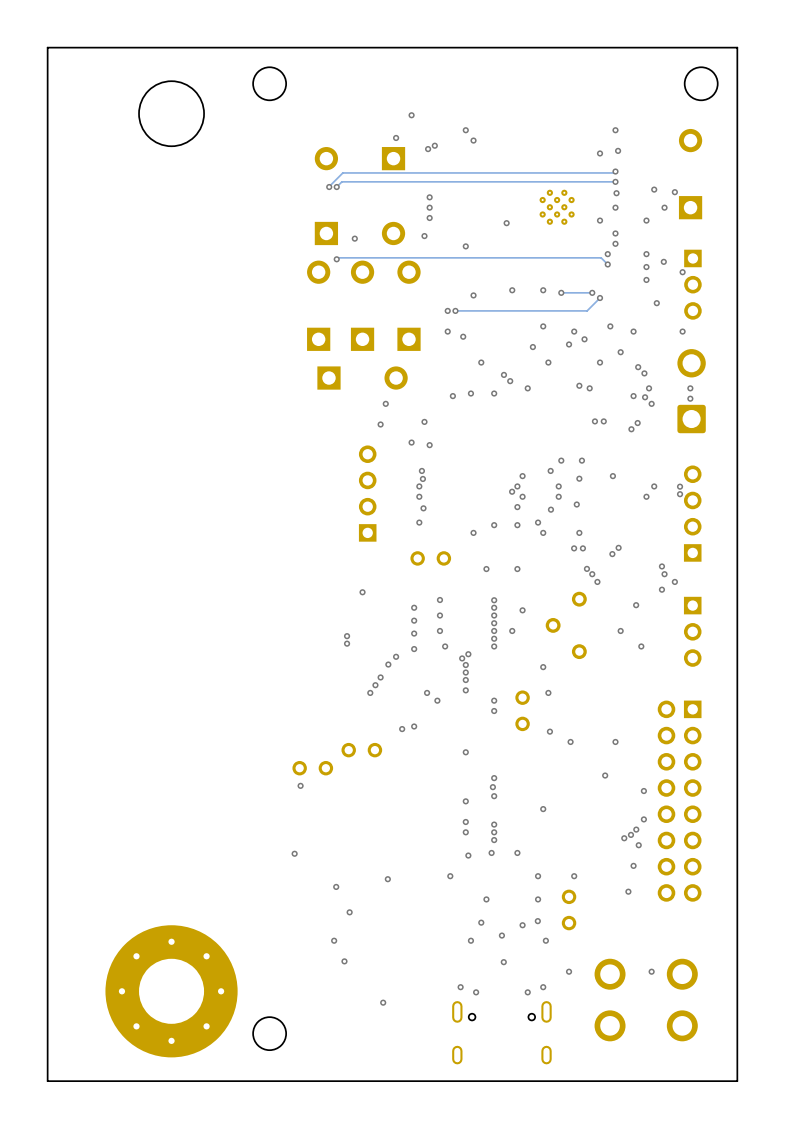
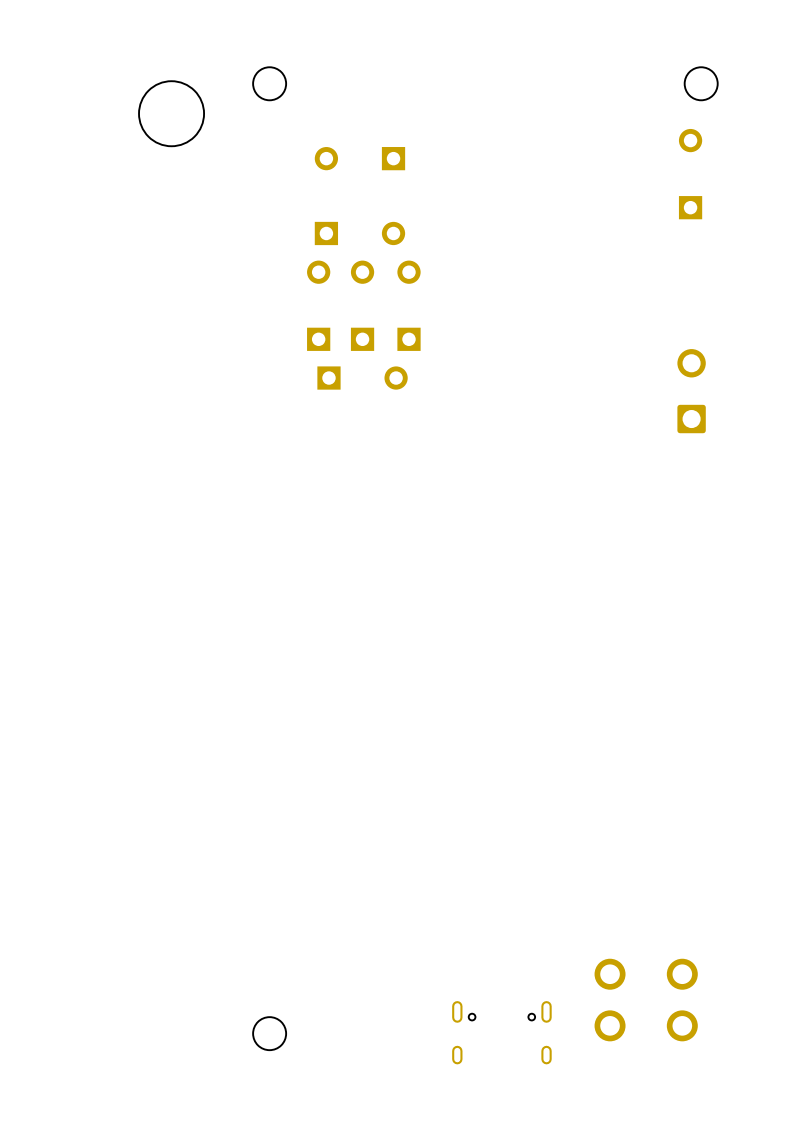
board edge: (737, 47) (47, 47) (47, 1081) (737, 1081) (737, 47) -> none
via: (411, 115) -> none
via: (465, 130) -> none
via: (615, 130) -> none
via: (396, 137) -> none
via: (473, 140) -> none
via: (434, 145) -> none
via: (428, 149) -> none
via: (618, 150) -> none
via: (600, 153) -> none
track: (615, 171) (342, 172) (329, 187) -> none
via: (615, 171) -> none
track: (615, 181) (341, 181) (336, 187) -> none
via: (615, 181) -> none
via: (329, 187) -> none
via: (336, 187) -> none
via: (654, 189) -> none
via: (674, 192) -> none
via: (616, 193) -> none
via: (429, 197) -> none
via: (429, 207) -> none
part: (557, 207) -> none
via: (615, 207) -> none
via: (664, 207) -> none
via: (429, 217) -> none
via: (600, 220) -> none
via: (646, 220) -> none
via: (506, 223) -> none
via: (615, 233) -> none
via: (424, 236) -> none
via: (354, 238) -> none
via: (615, 243) -> none
via: (465, 246) -> none
via: (607, 254) -> none
via: (646, 254) -> none
track: (336, 259) (601, 257) (607, 264) -> none
via: (336, 259) -> none
via: (663, 261) -> none
via: (607, 264) -> none
via: (646, 267) -> none
via: (682, 272) -> none
via: (646, 279) -> none
part: (692, 284) -> none
via: (512, 290) -> none
via: (543, 290) -> none
via: (561, 292) -> none
track: (592, 292) (561, 292) -> none
via: (592, 292) -> none
via: (473, 295) -> none
track: (600, 298) (587, 310) (455, 310) -> none
via: (600, 298) -> none
via: (656, 303) -> none
via: (447, 310) -> none
via: (455, 310) -> none
via: (543, 326) -> none
via: (610, 326) -> none
via: (447, 331) -> none
via: (574, 331) -> none
via: (633, 331) -> none
via: (682, 331) -> none
via: (463, 336) -> none
via: (584, 339) -> none
via: (569, 344) -> none
via: (532, 347) -> none
via: (620, 352) -> none
via: (481, 362) -> none
via: (548, 362) -> none
via: (600, 362) -> none
via: (638, 367) -> none
via: (644, 373) -> none
via: (503, 374) -> none
via: (510, 381) -> none
via: (579, 385) -> none
via: (527, 388) -> none
via: (589, 388) -> none
via: (649, 388) -> none
via: (690, 388) -> none
via: (470, 393) -> none
via: (494, 393) -> none
via: (452, 396) -> none
via: (633, 396) -> none
via: (645, 397) -> none
via: (690, 398) -> none
via: (385, 403) -> none
via: (651, 403) -> none
via: (424, 421) -> none
via: (594, 421) -> none
via: (603, 421) -> none
via: (637, 423) -> none
via: (380, 424) -> none
via: (631, 429) -> none
via: (411, 442) -> none
via: (429, 445) -> none
via: (561, 460) -> none
via: (581, 460) -> none
via: (421, 470) -> none
via: (550, 470) -> none
via: (522, 476) -> none
via: (612, 476) -> none
via: (422, 478) -> none
via: (579, 478) -> none
via: (419, 486) -> none
via: (517, 486) -> none
via: (558, 486) -> none
via: (654, 486) -> none
via: (680, 486) -> none
via: (512, 491) -> none
part: (367, 493) -> none
via: (680, 494) -> none
via: (419, 496) -> none
via: (522, 496) -> none
via: (558, 496) -> none
via: (646, 496) -> none
via: (576, 504) -> none
via: (517, 507) -> none
via: (423, 508) -> none
via: (550, 509) -> none
part: (692, 513) -> none
via: (419, 522) -> none
via: (538, 522) -> none
via: (494, 525) -> none
via: (517, 525) -> none
via: (473, 532) -> none
via: (543, 532) -> none
via: (579, 532) -> none
via: (618, 547) -> none
via: (574, 548) -> none
via: (582, 548) -> none
via: (612, 554) -> none
part: (430, 558) -> none
via: (661, 566) -> none
via: (586, 568) -> none
via: (486, 569) -> none
via: (517, 569) -> none
via: (592, 574) -> none
via: (664, 574) -> none
via: (597, 581) -> none
via: (674, 581) -> none
via: (661, 589) -> none
via: (362, 592) -> none
via: (439, 600) -> none
via: (494, 600) -> none
via: (636, 605) -> none
via: (414, 607) -> none
via: (494, 607) -> none
via: (522, 610) -> none
via: (439, 615) -> none
via: (494, 615) -> none
via: (414, 620) -> none
via: (494, 623) -> none
part: (566, 625) -> none
via: (439, 630) -> none
via: (494, 630) -> none
via: (512, 630) -> none
via: (620, 630) -> none
part: (692, 631) -> none
via: (414, 633) -> none
via: (347, 636) -> none
via: (494, 638) -> none
via: (347, 643) -> none
via: (445, 646) -> none
via: (494, 646) -> none
via: (641, 646) -> none
via: (414, 649) -> none
via: (468, 654) -> none
via: (396, 656) -> none
via: (462, 658) -> none
via: (388, 664) -> none
via: (465, 665) -> none
via: (543, 667) -> none
via: (465, 672) -> none
via: (380, 677) -> none
via: (465, 680) -> none
via: (375, 685) -> none
via: (465, 690) -> none
via: (370, 692) -> none
via: (427, 692) -> none
via: (548, 692) -> none
via: (437, 700) -> none
via: (494, 700) -> none
part: (522, 710) -> none
via: (494, 711) -> none
via: (414, 726) -> none
via: (402, 729) -> none
via: (549, 731) -> none
via: (570, 741) -> none
via: (615, 741) -> none
part: (361, 750) -> none
via: (465, 752) -> none
part: (312, 768) -> none
via: (605, 775) -> none
via: (494, 778) -> none
via: (300, 785) -> none
via: (492, 787) -> none
via: (643, 791) -> none
via: (494, 796) -> none
via: (465, 801) -> none
part: (679, 801) -> none
via: (543, 809) -> none
via: (643, 819) -> none
via: (465, 821) -> none
via: (494, 824) -> none
via: (636, 829) -> none
via: (465, 832) -> none
via: (494, 832) -> none
via: (630, 834) -> none
via: (624, 838) -> none
via: (494, 840) -> none
via: (638, 845) -> none
via: (491, 852) -> none
via: (517, 852) -> none
via: (294, 853) -> none
via: (468, 855) -> none
via: (633, 865) -> none
via: (450, 876) -> none
via: (538, 876) -> none
via: (574, 876) -> none
via: (387, 879) -> none
via: (336, 886) -> none
via: (628, 891) -> none
via: (486, 899) -> none
via: (538, 899) -> none
part: (569, 909) -> none
via: (349, 912) -> none
via: (537, 921) -> none
via: (481, 922) -> none
via: (522, 925) -> none
via: (501, 935) -> none
via: (334, 940) -> none
via: (470, 940) -> none
via: (545, 940) -> none
via: (344, 961) -> none
via: (503, 962) -> none
via: (569, 971) -> none
via: (651, 971) -> none
via: (460, 987) -> none
via: (543, 987) -> none
part: (171, 991) -> none
via: (476, 992) -> none
via: (527, 992) -> none
via: (383, 1002) -> none

